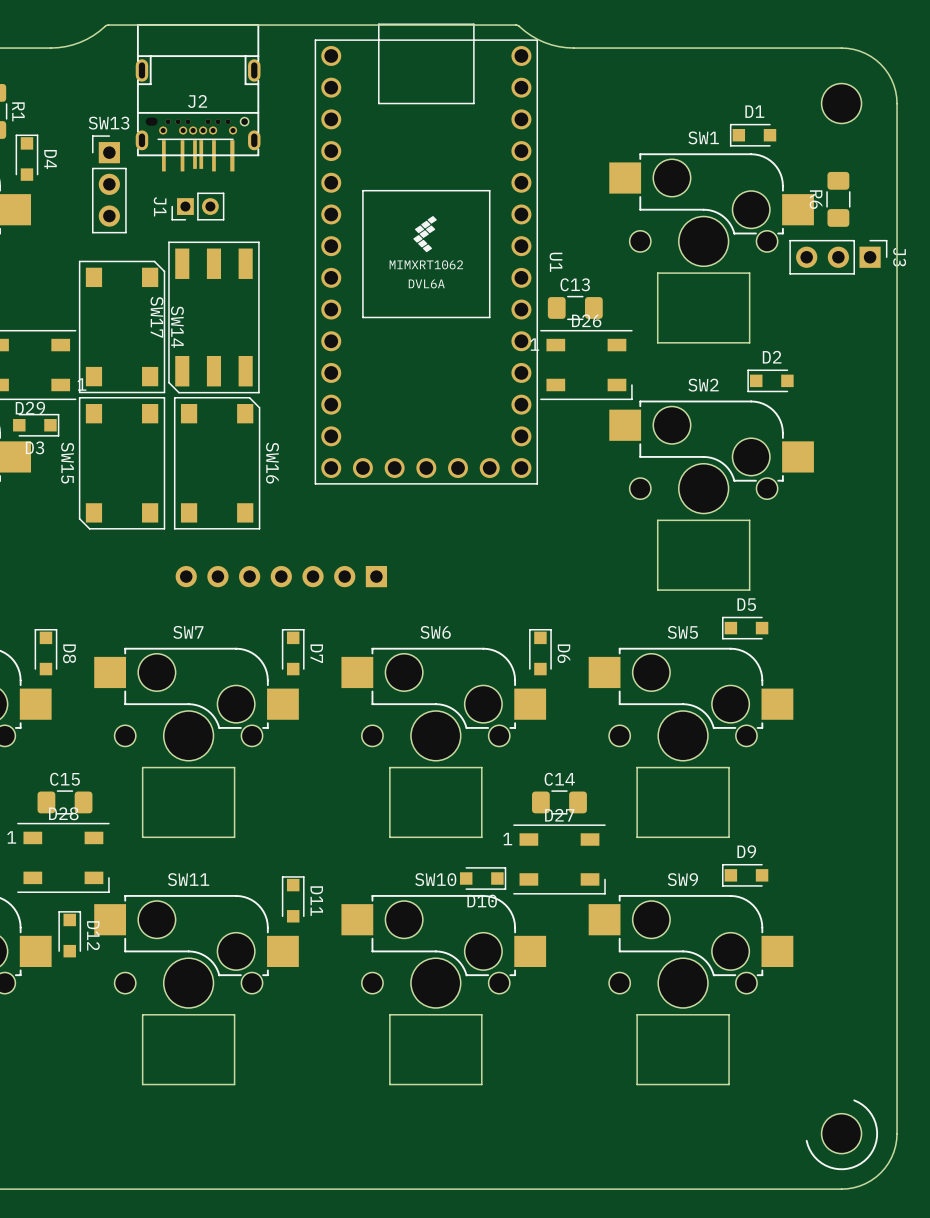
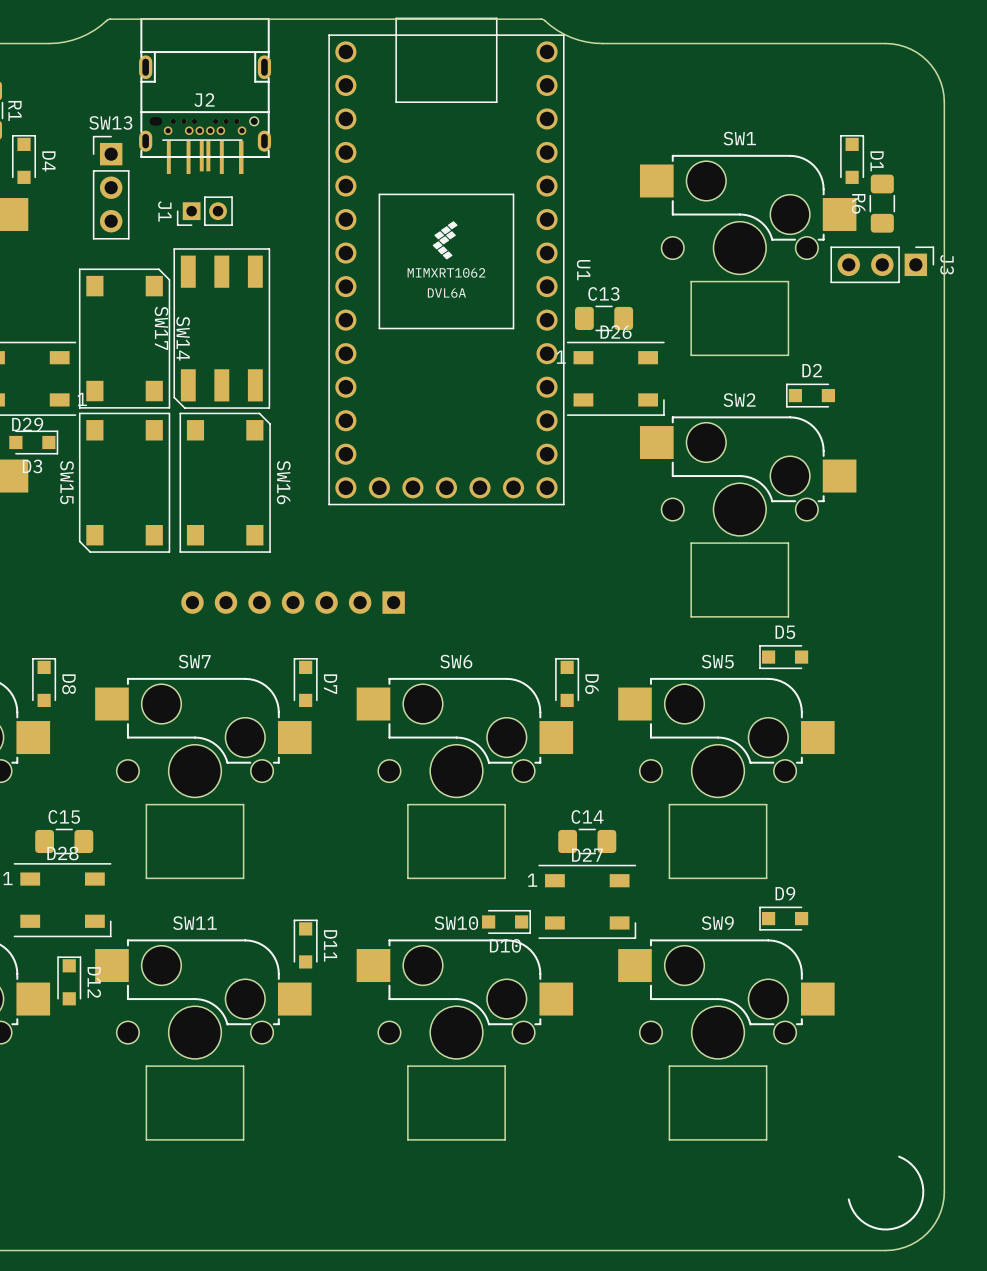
part: (841, 103) -> none
D1 rotation: 0° (753, 135) -> 90° clockwise (852, 159)
D1 position: (753, 135) -> (852, 159)
part: (841, 1133) -> none

